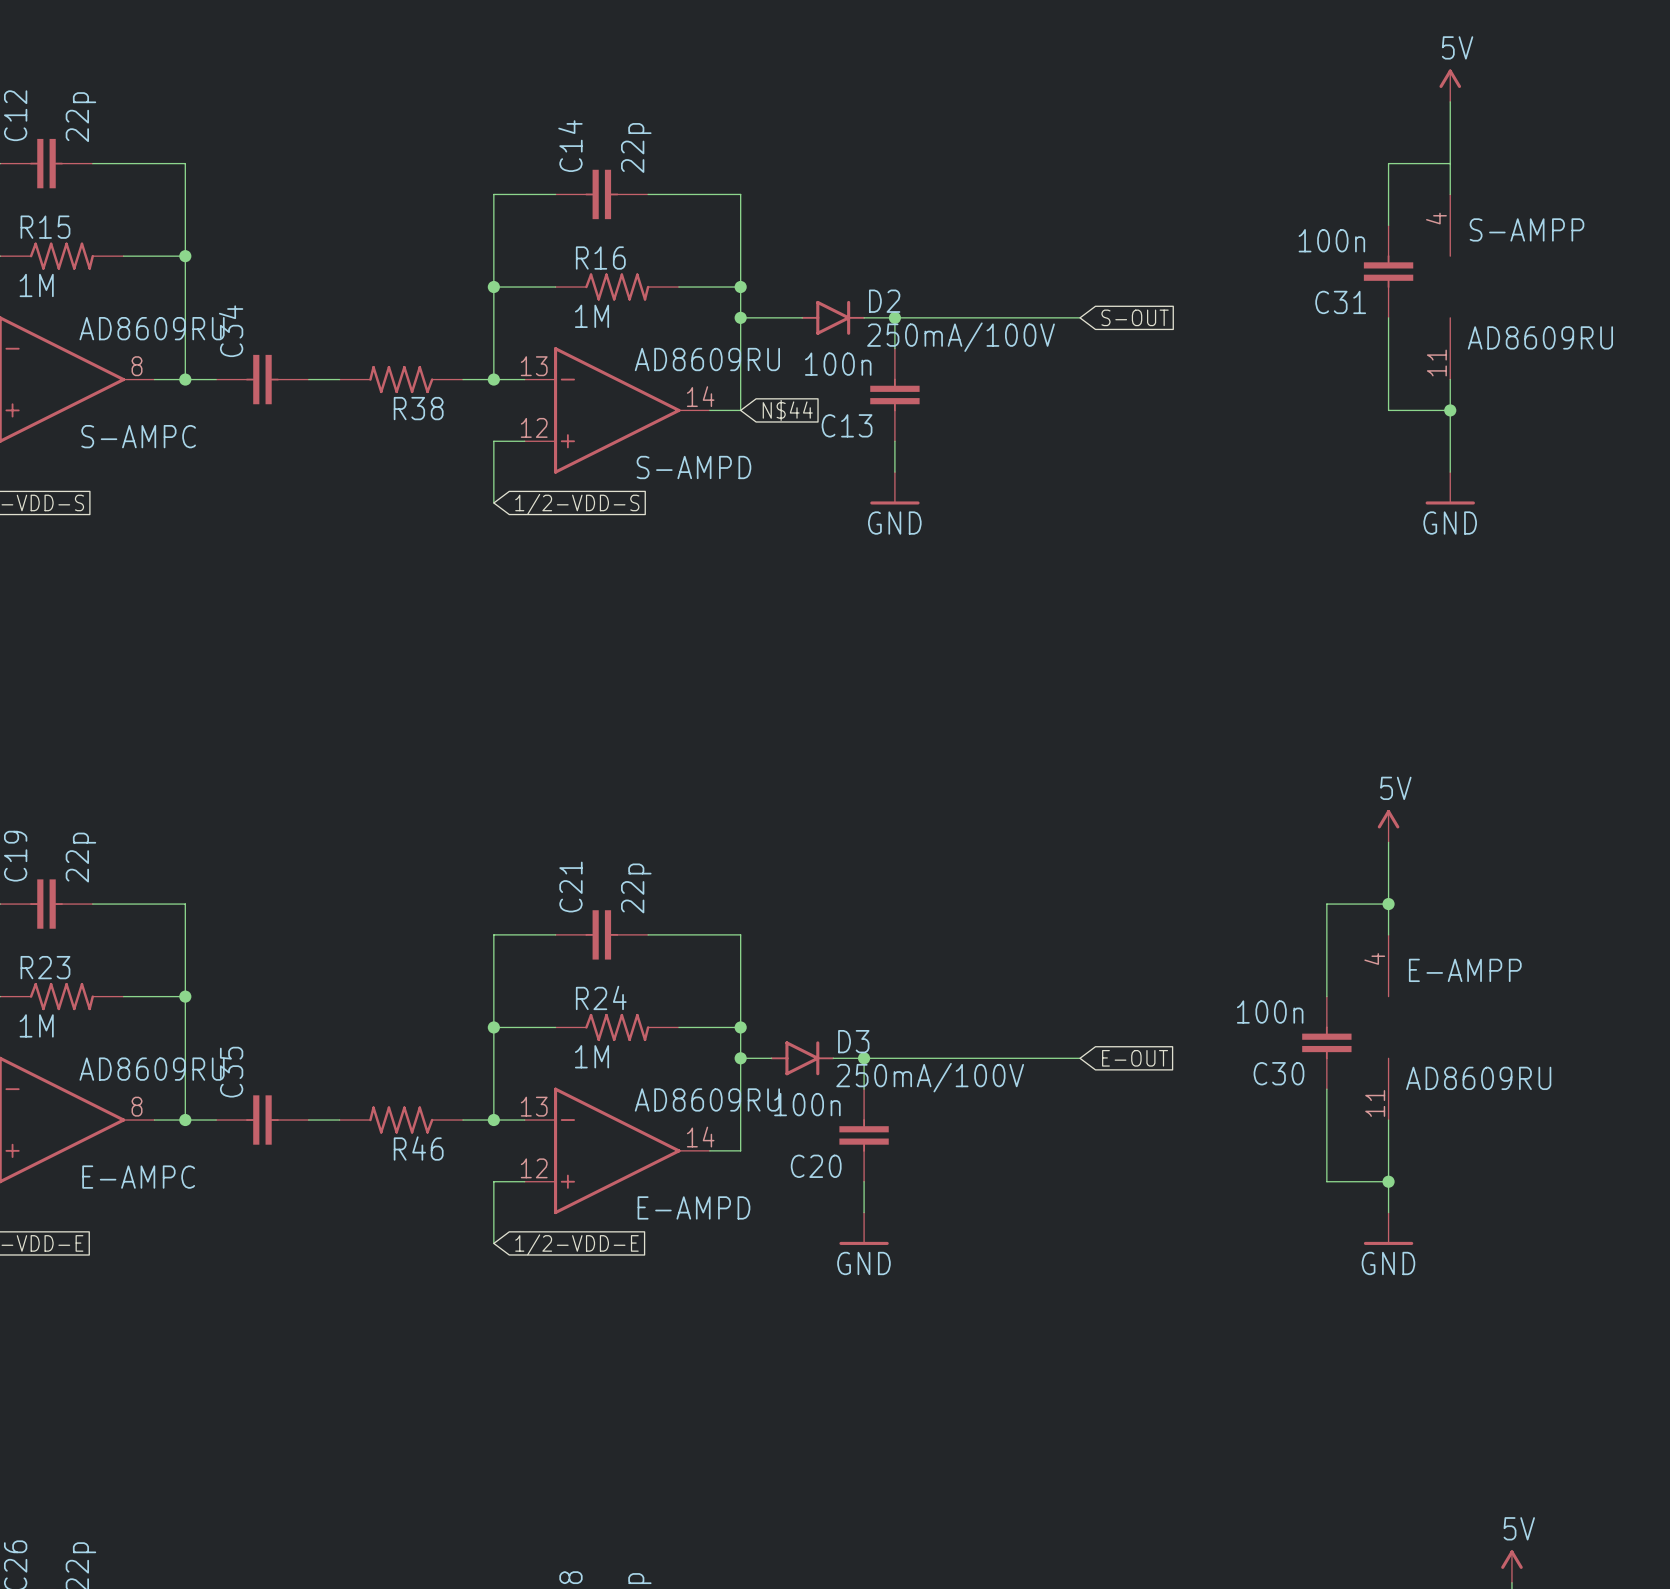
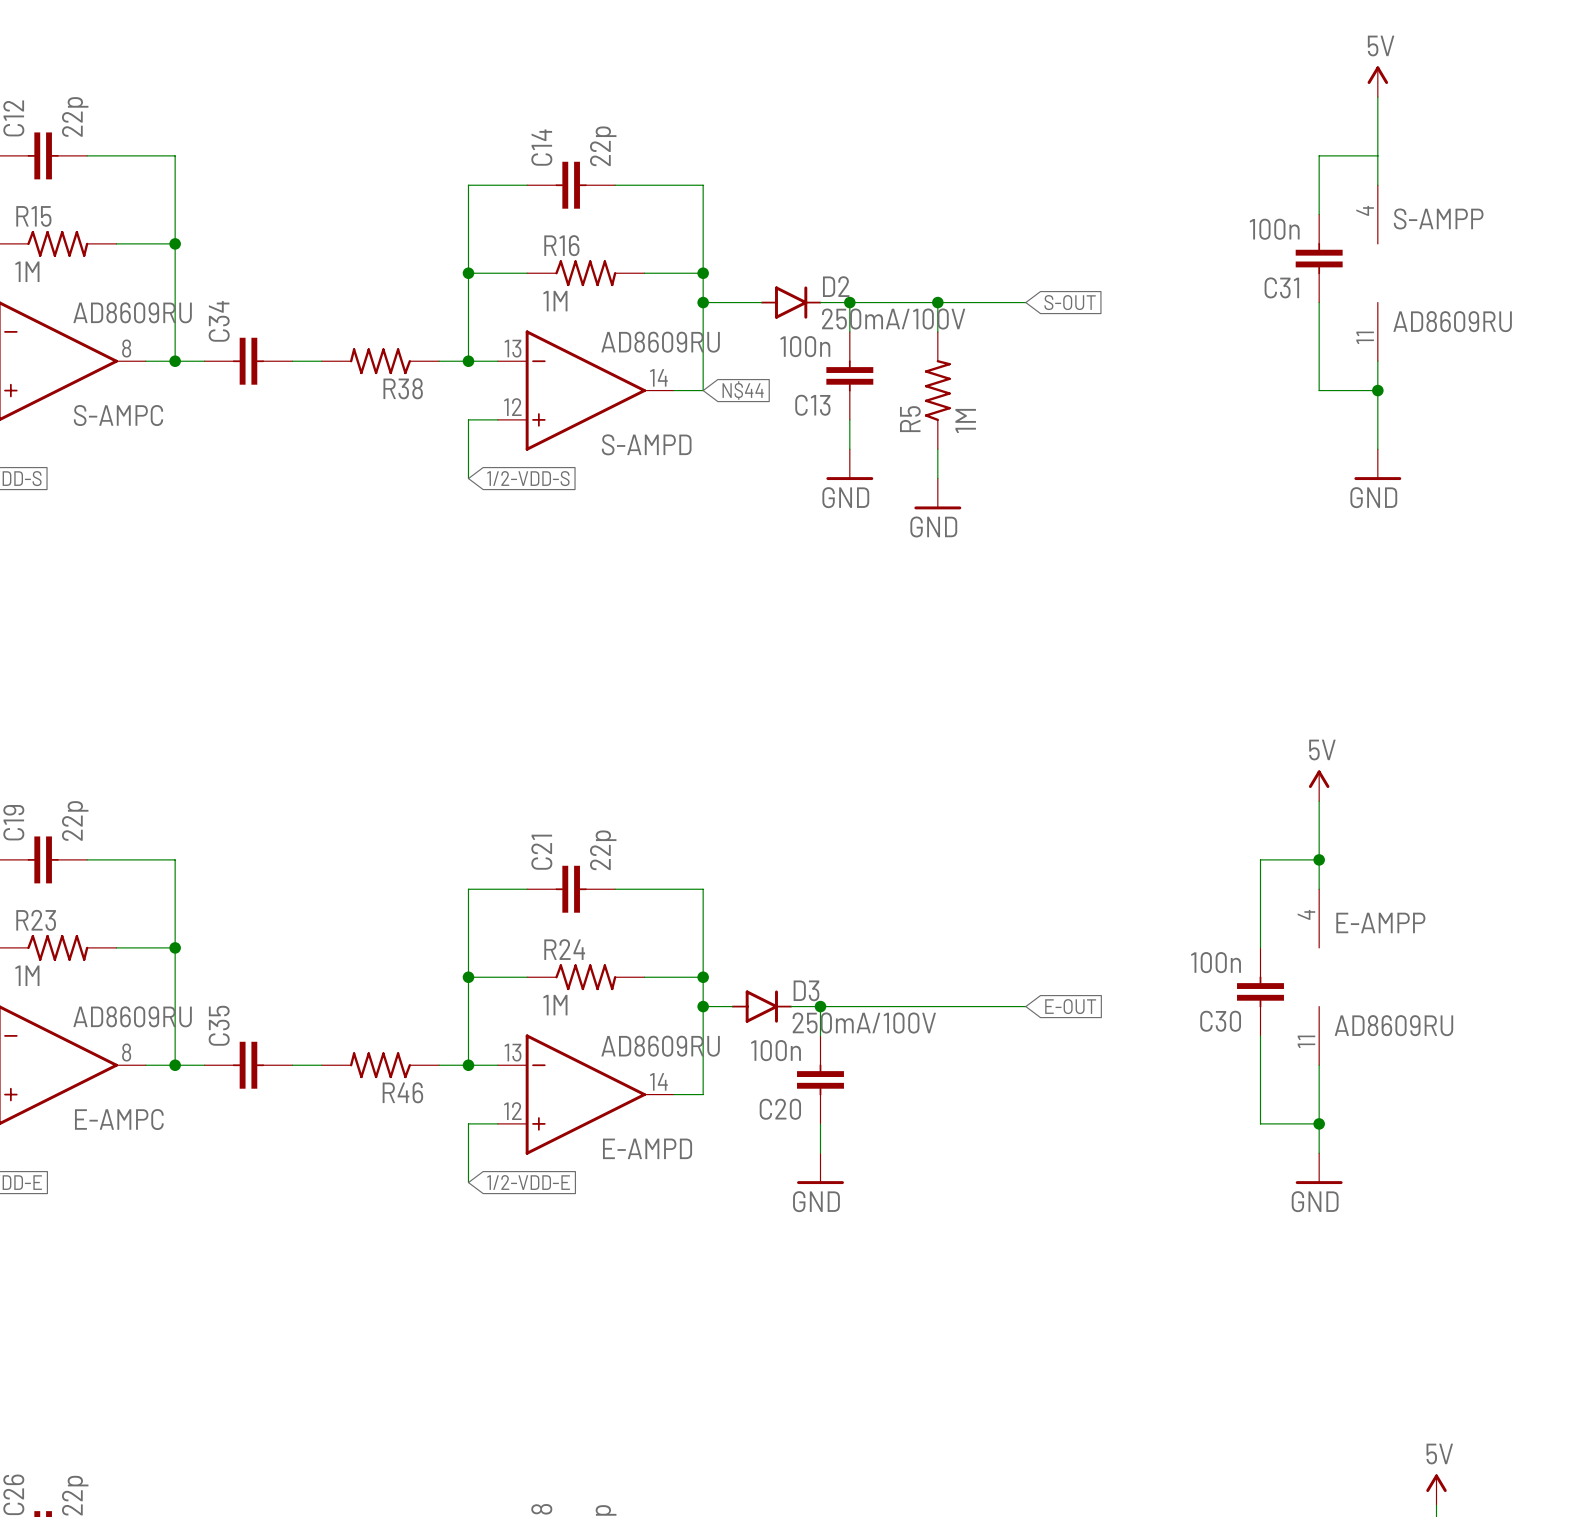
wire: none -> (937, 302) (937, 331)
junction: none -> (937, 302)
R5: none -> 1M (937, 390)
wire: none -> (937, 449) (937, 478)
power symbol: none -> GND (937, 493)

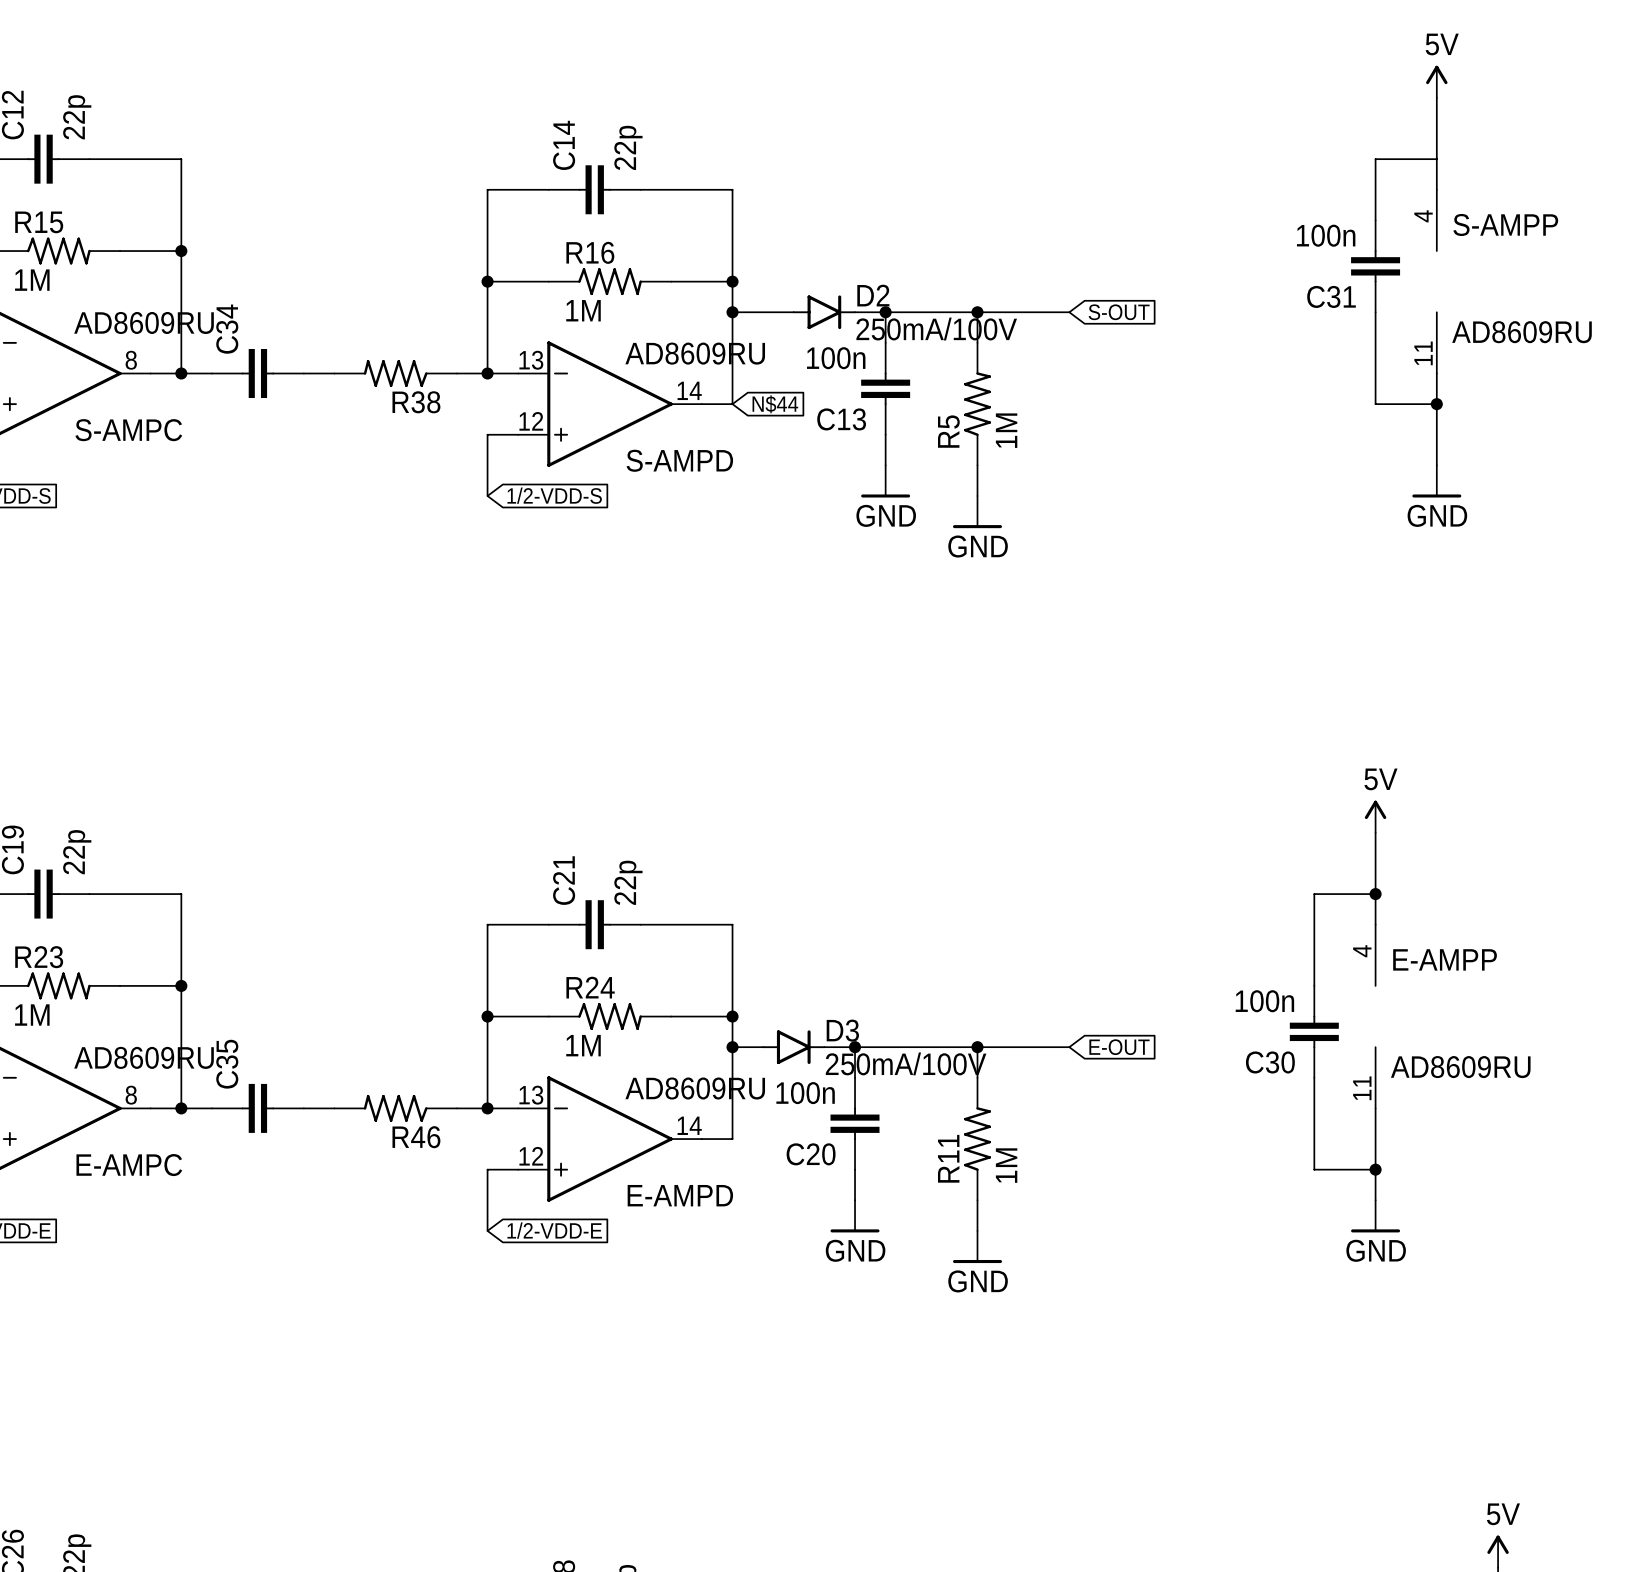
wire: none -> (977, 1047) (977, 1077)
junction: none -> (977, 1047)
R11: none -> 1M (977, 1139)
wire: none -> (977, 1200) (977, 1230)
power symbol: none -> GND (977, 1246)

